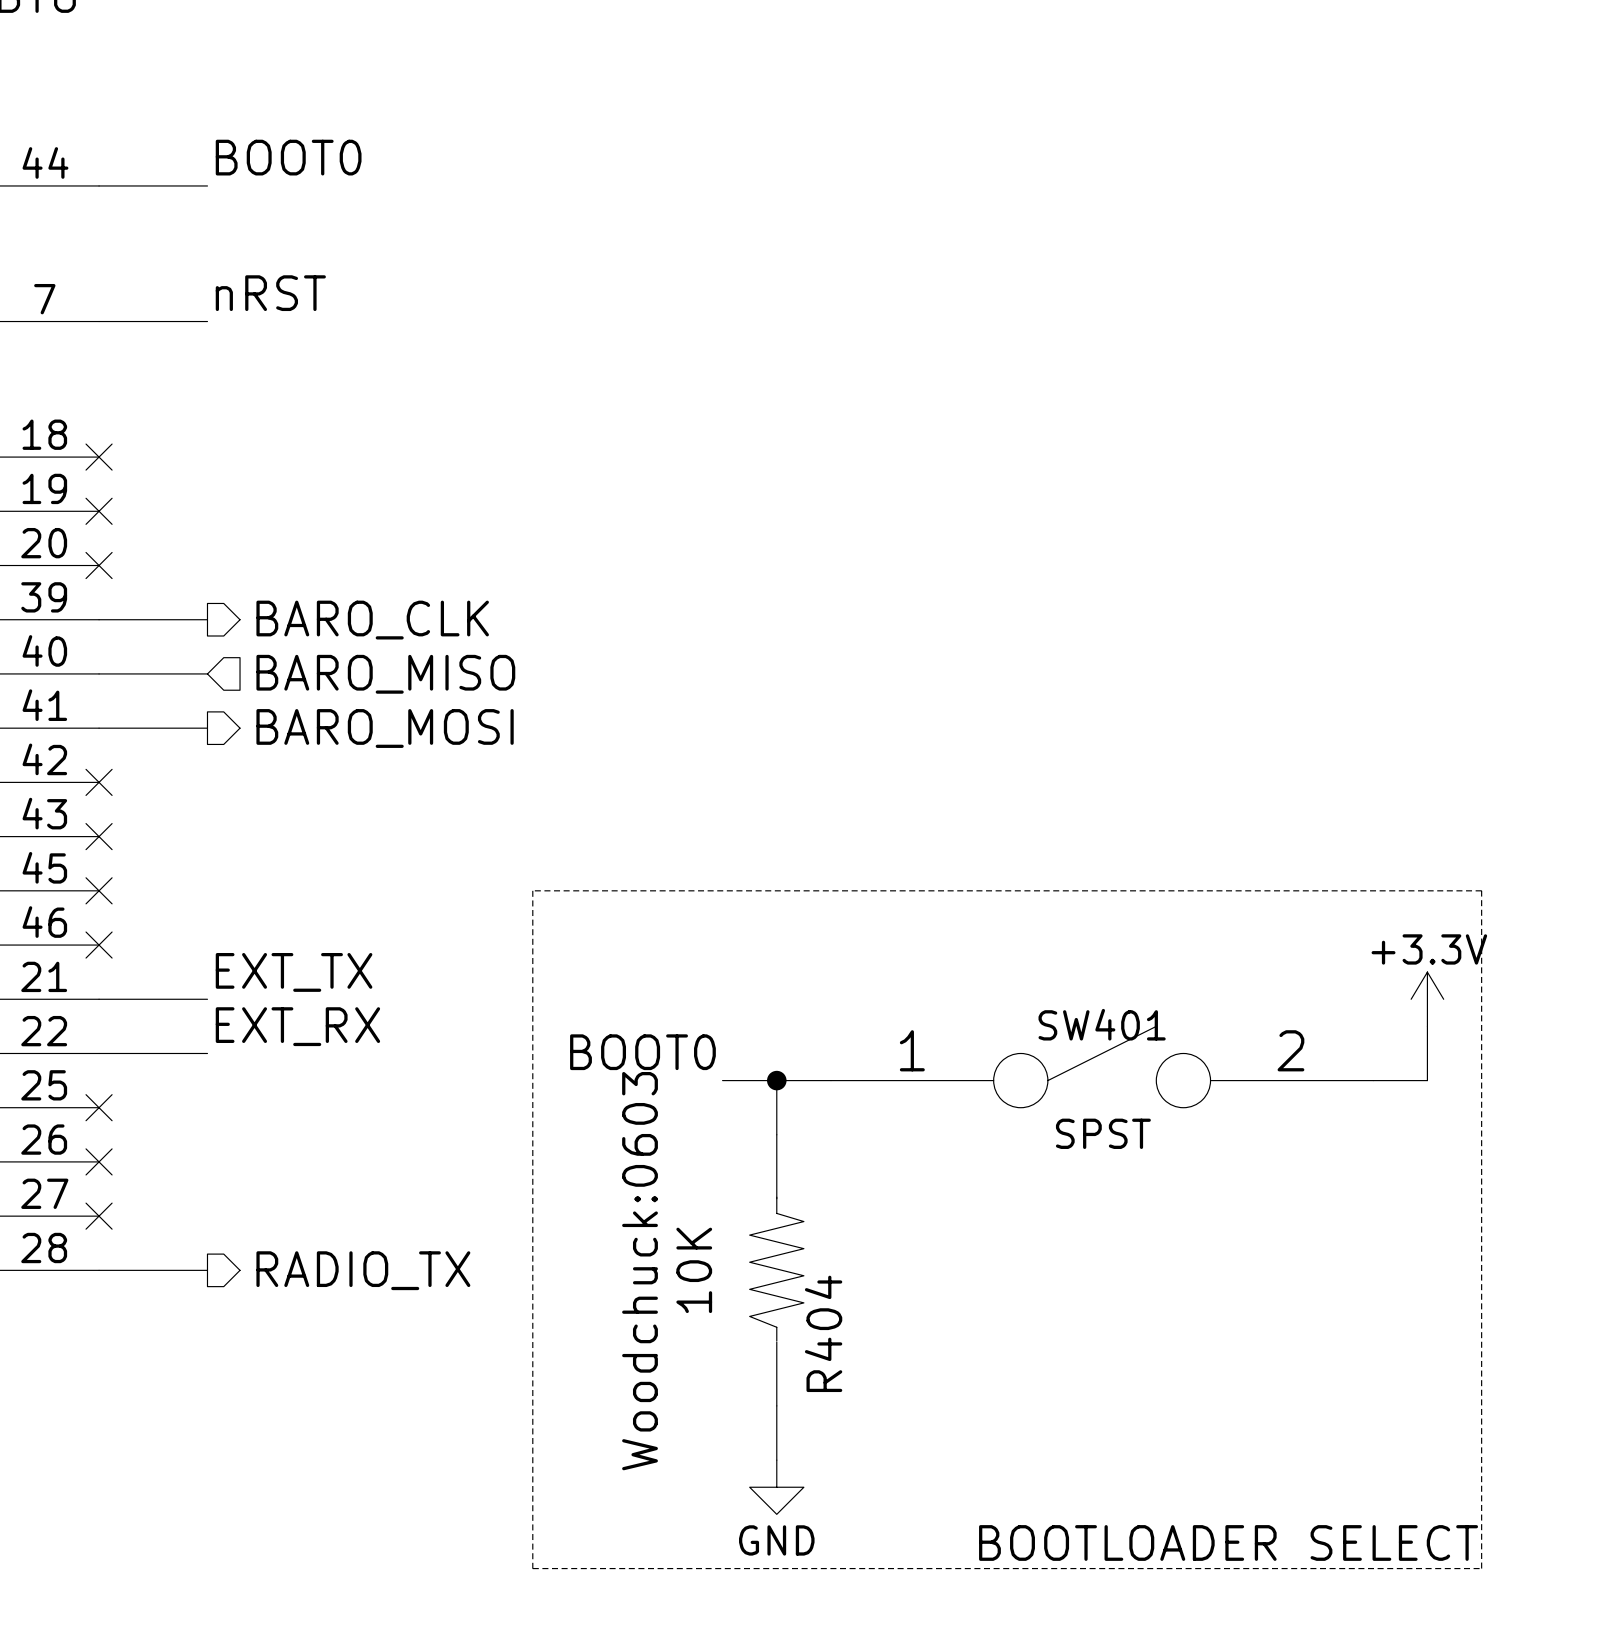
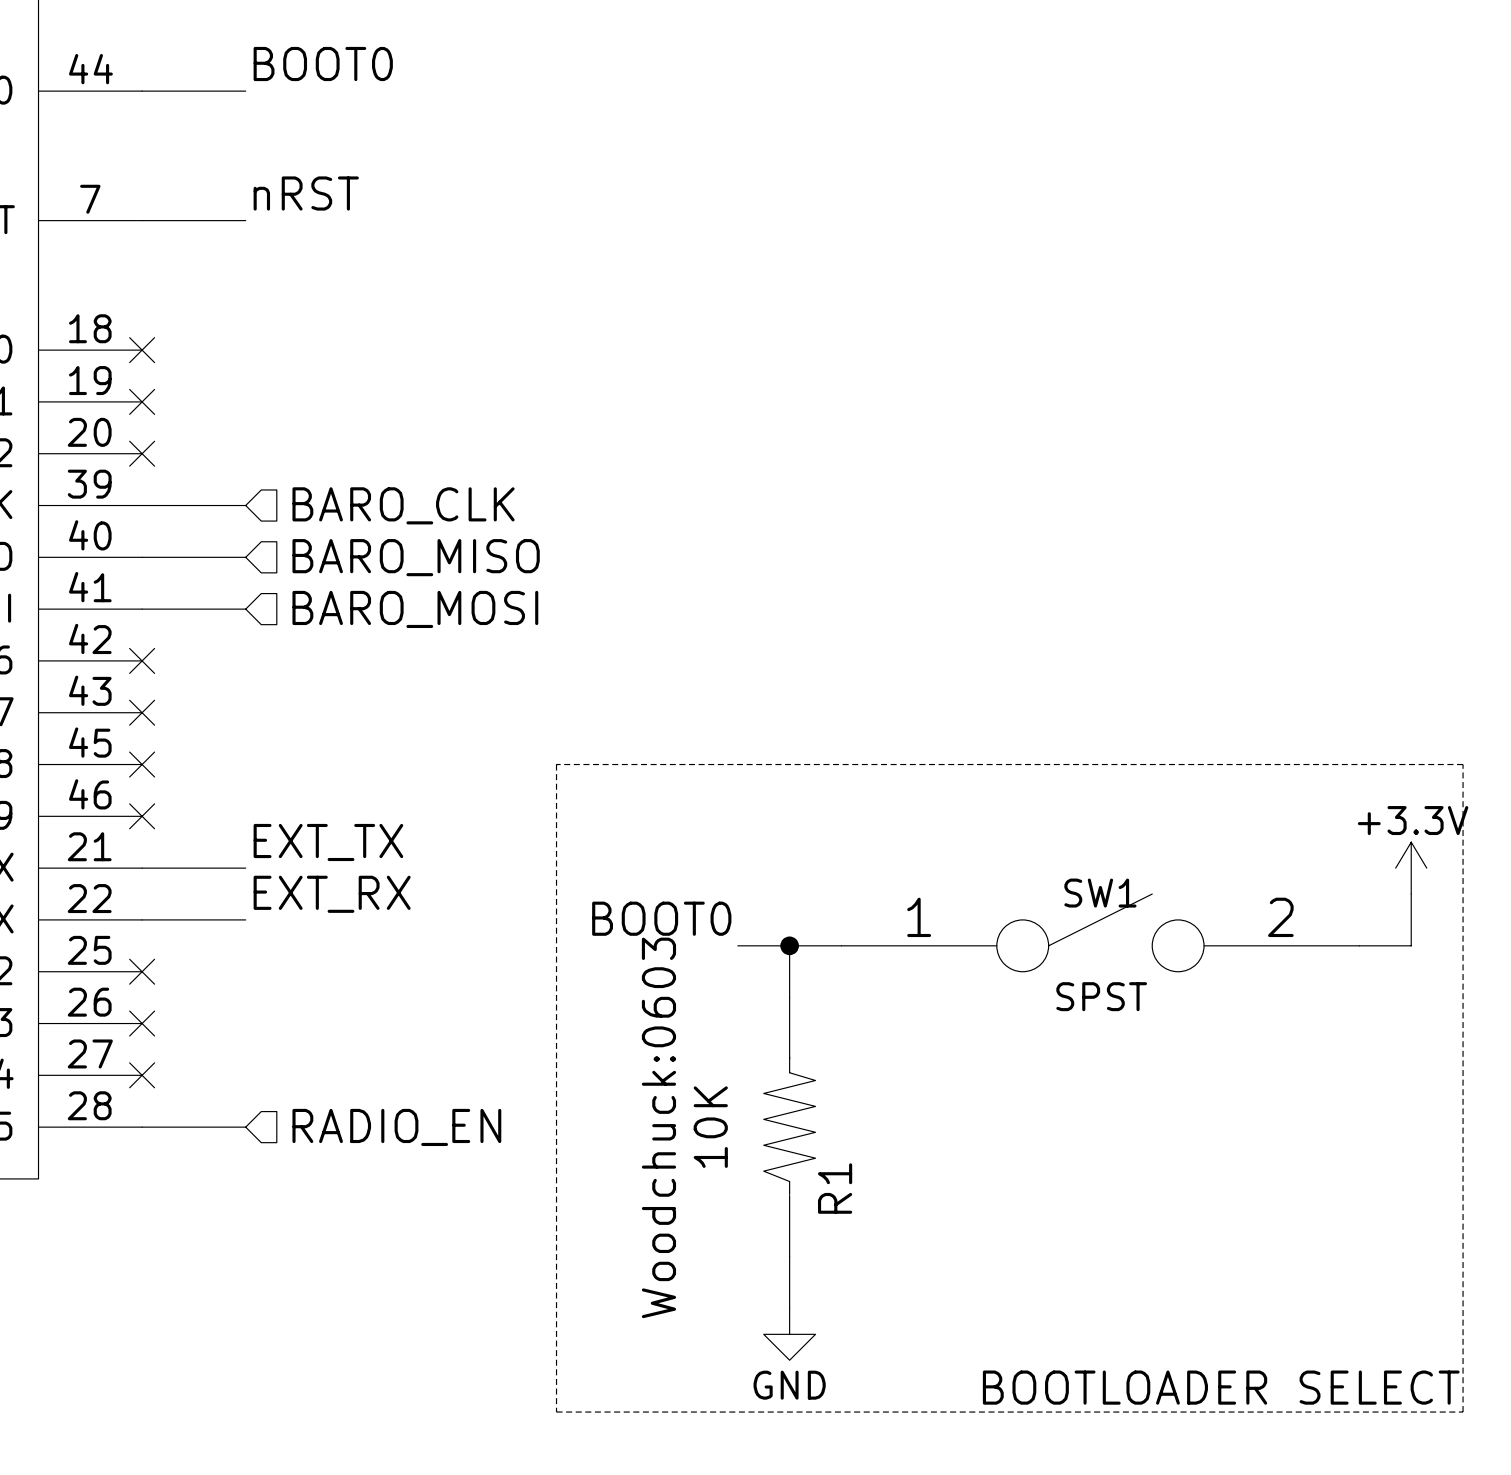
hierarchical label shape: output (372, 620) -> input (403, 505)
hierarchical label shape: output (385, 728) -> input (415, 609)
SW401 name: SW401 (1102, 1024) -> SW1 (1100, 893)
hierarchical label shape: output (363, 1270) -> input (396, 1127)
hierarchical label: RADIO_TX (363, 1270) -> RADIO_EN (396, 1127)
R404 name: R404 (823, 1333) -> R1 (835, 1188)

